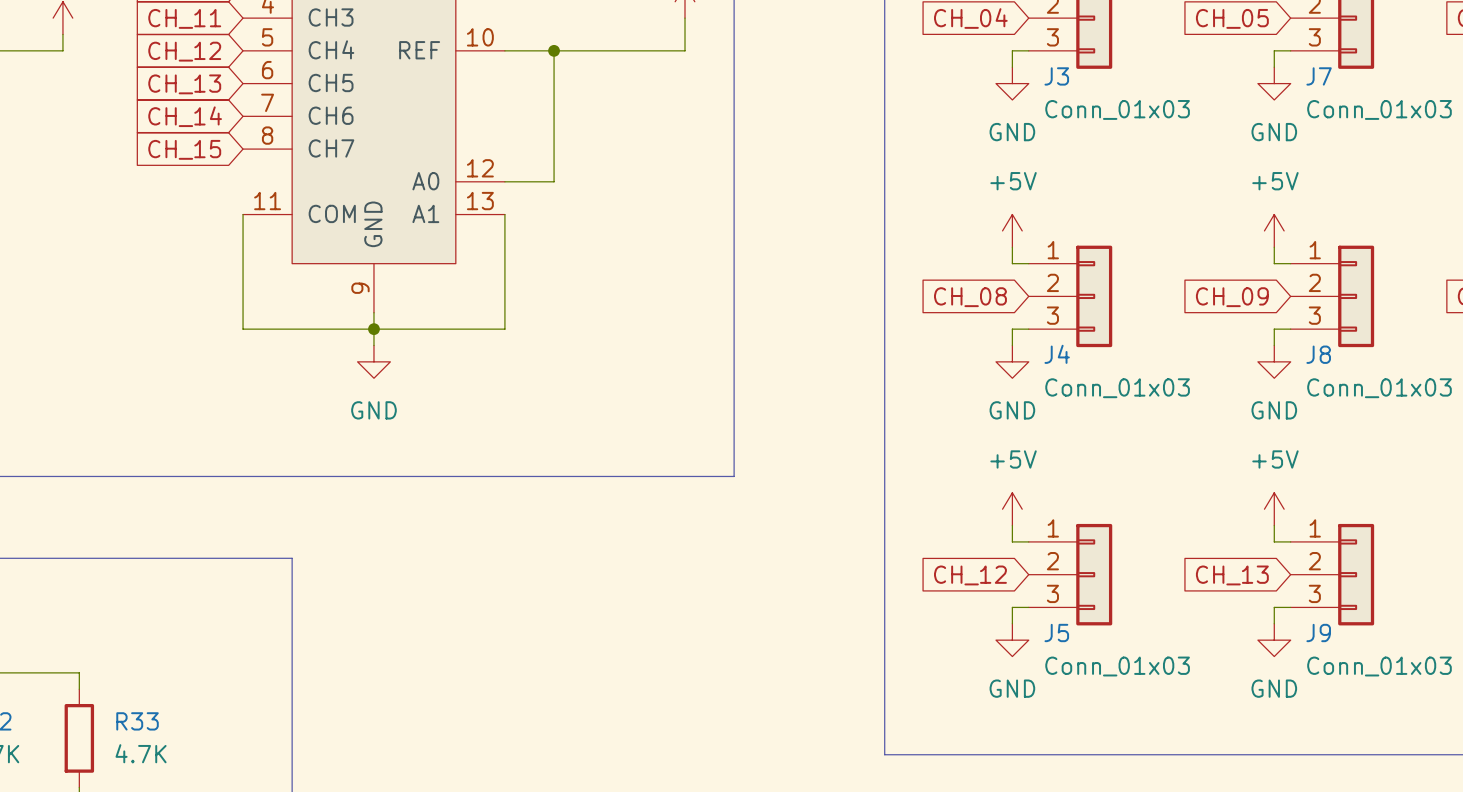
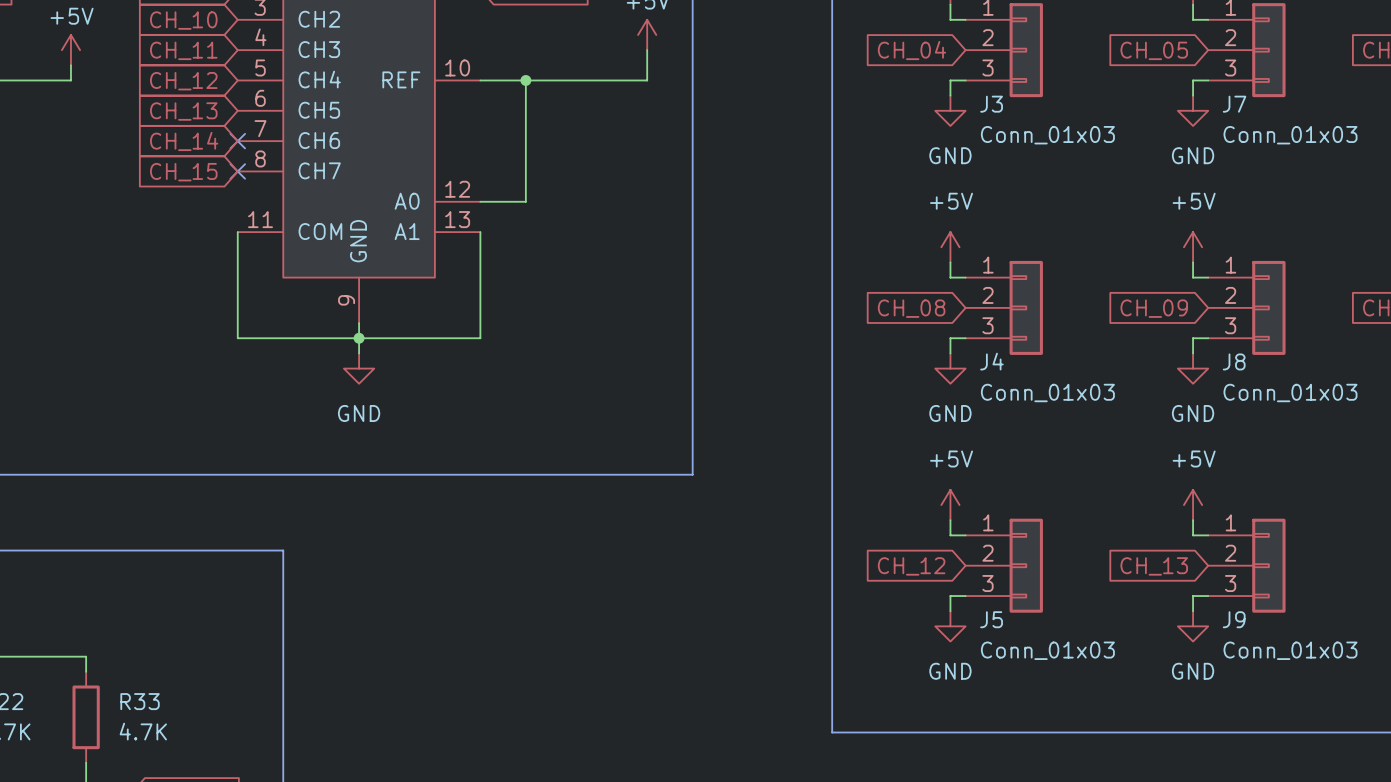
no-connect mark: none -> (237, 141)
no-connect mark: none -> (237, 171)

